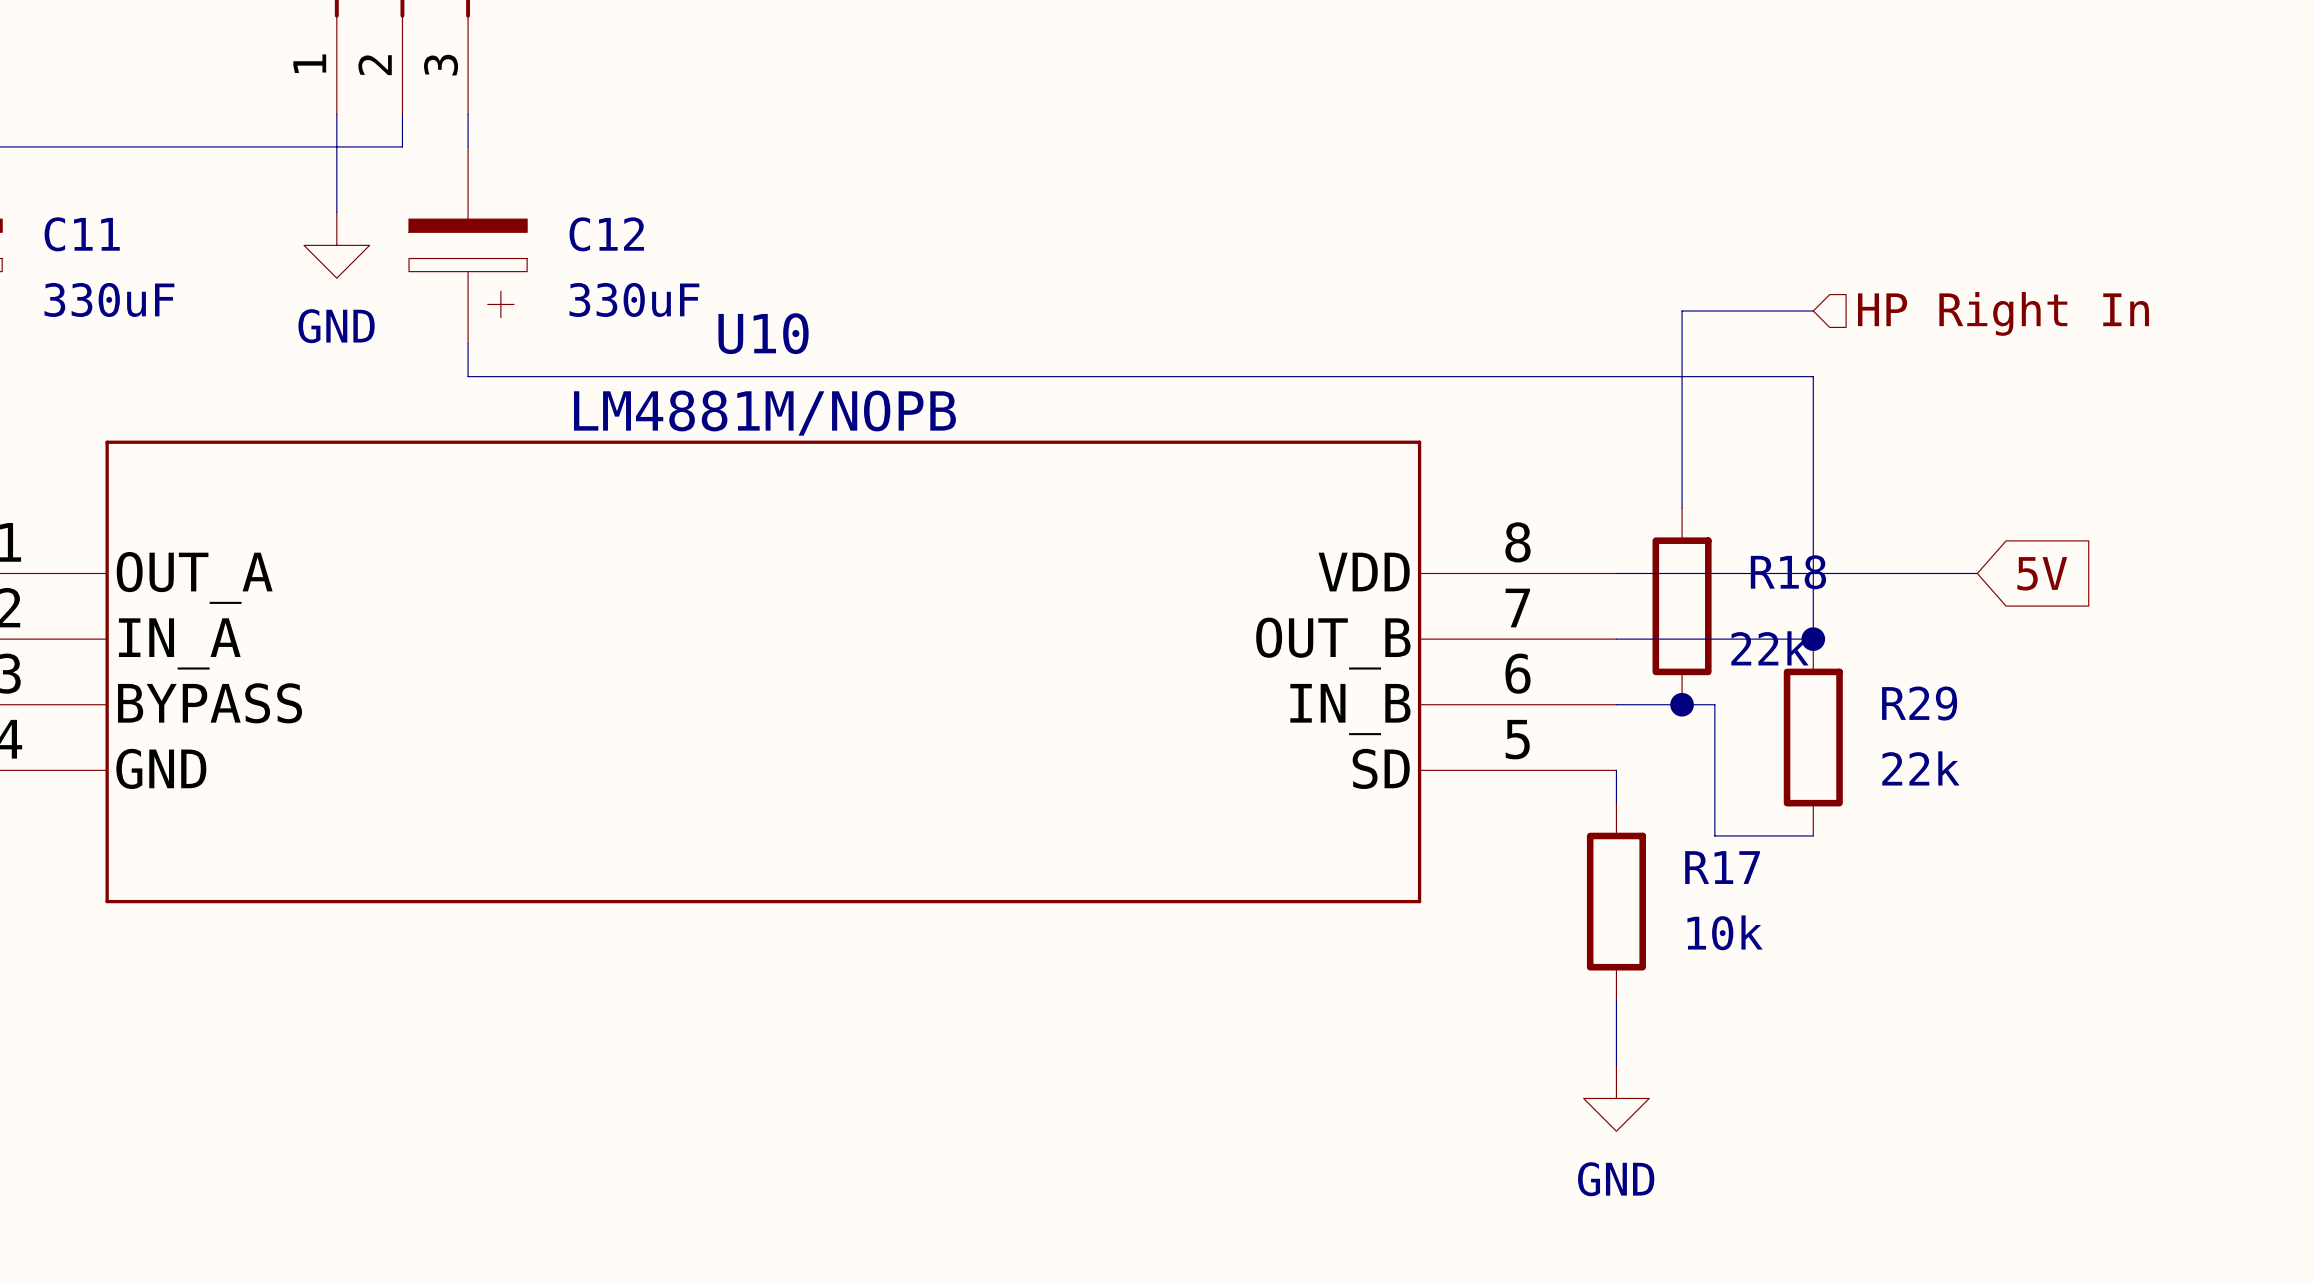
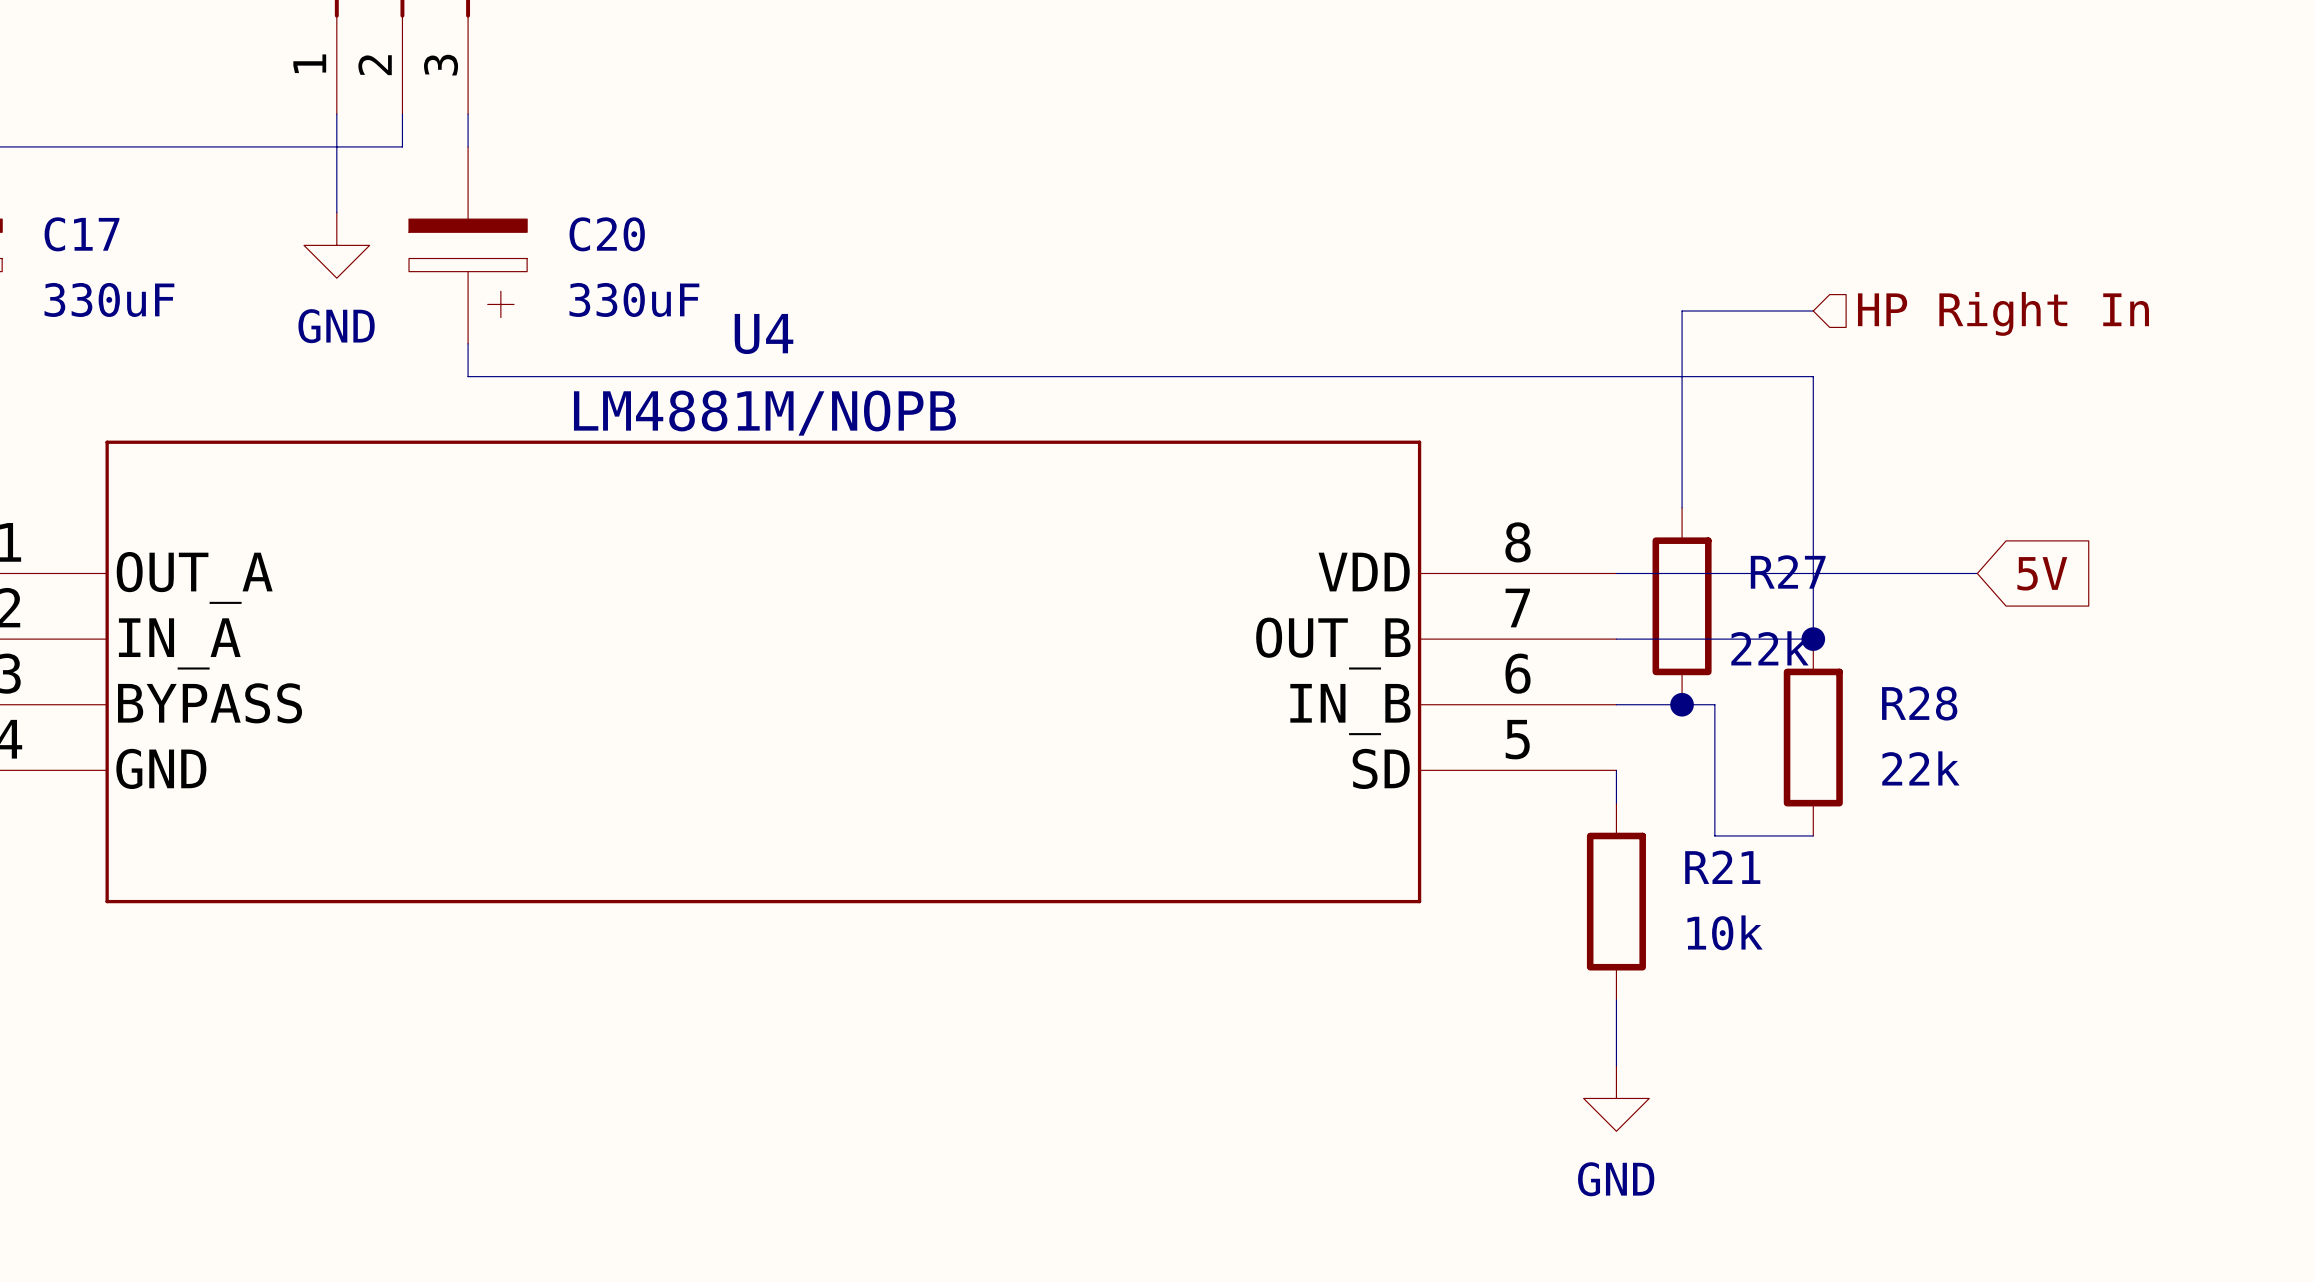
C11 name: C11 (82, 234) -> C17 (82, 234)
C12 name: C12 (606, 234) -> C20 (607, 234)
U10 name: U10 (763, 333) -> U4 (764, 334)
R18 name: R18 (1788, 572) -> R27 (1788, 571)
R29 name: R29 (1919, 703) -> R28 (1919, 703)
R17 name: R17 (1722, 867) -> R21 (1722, 867)

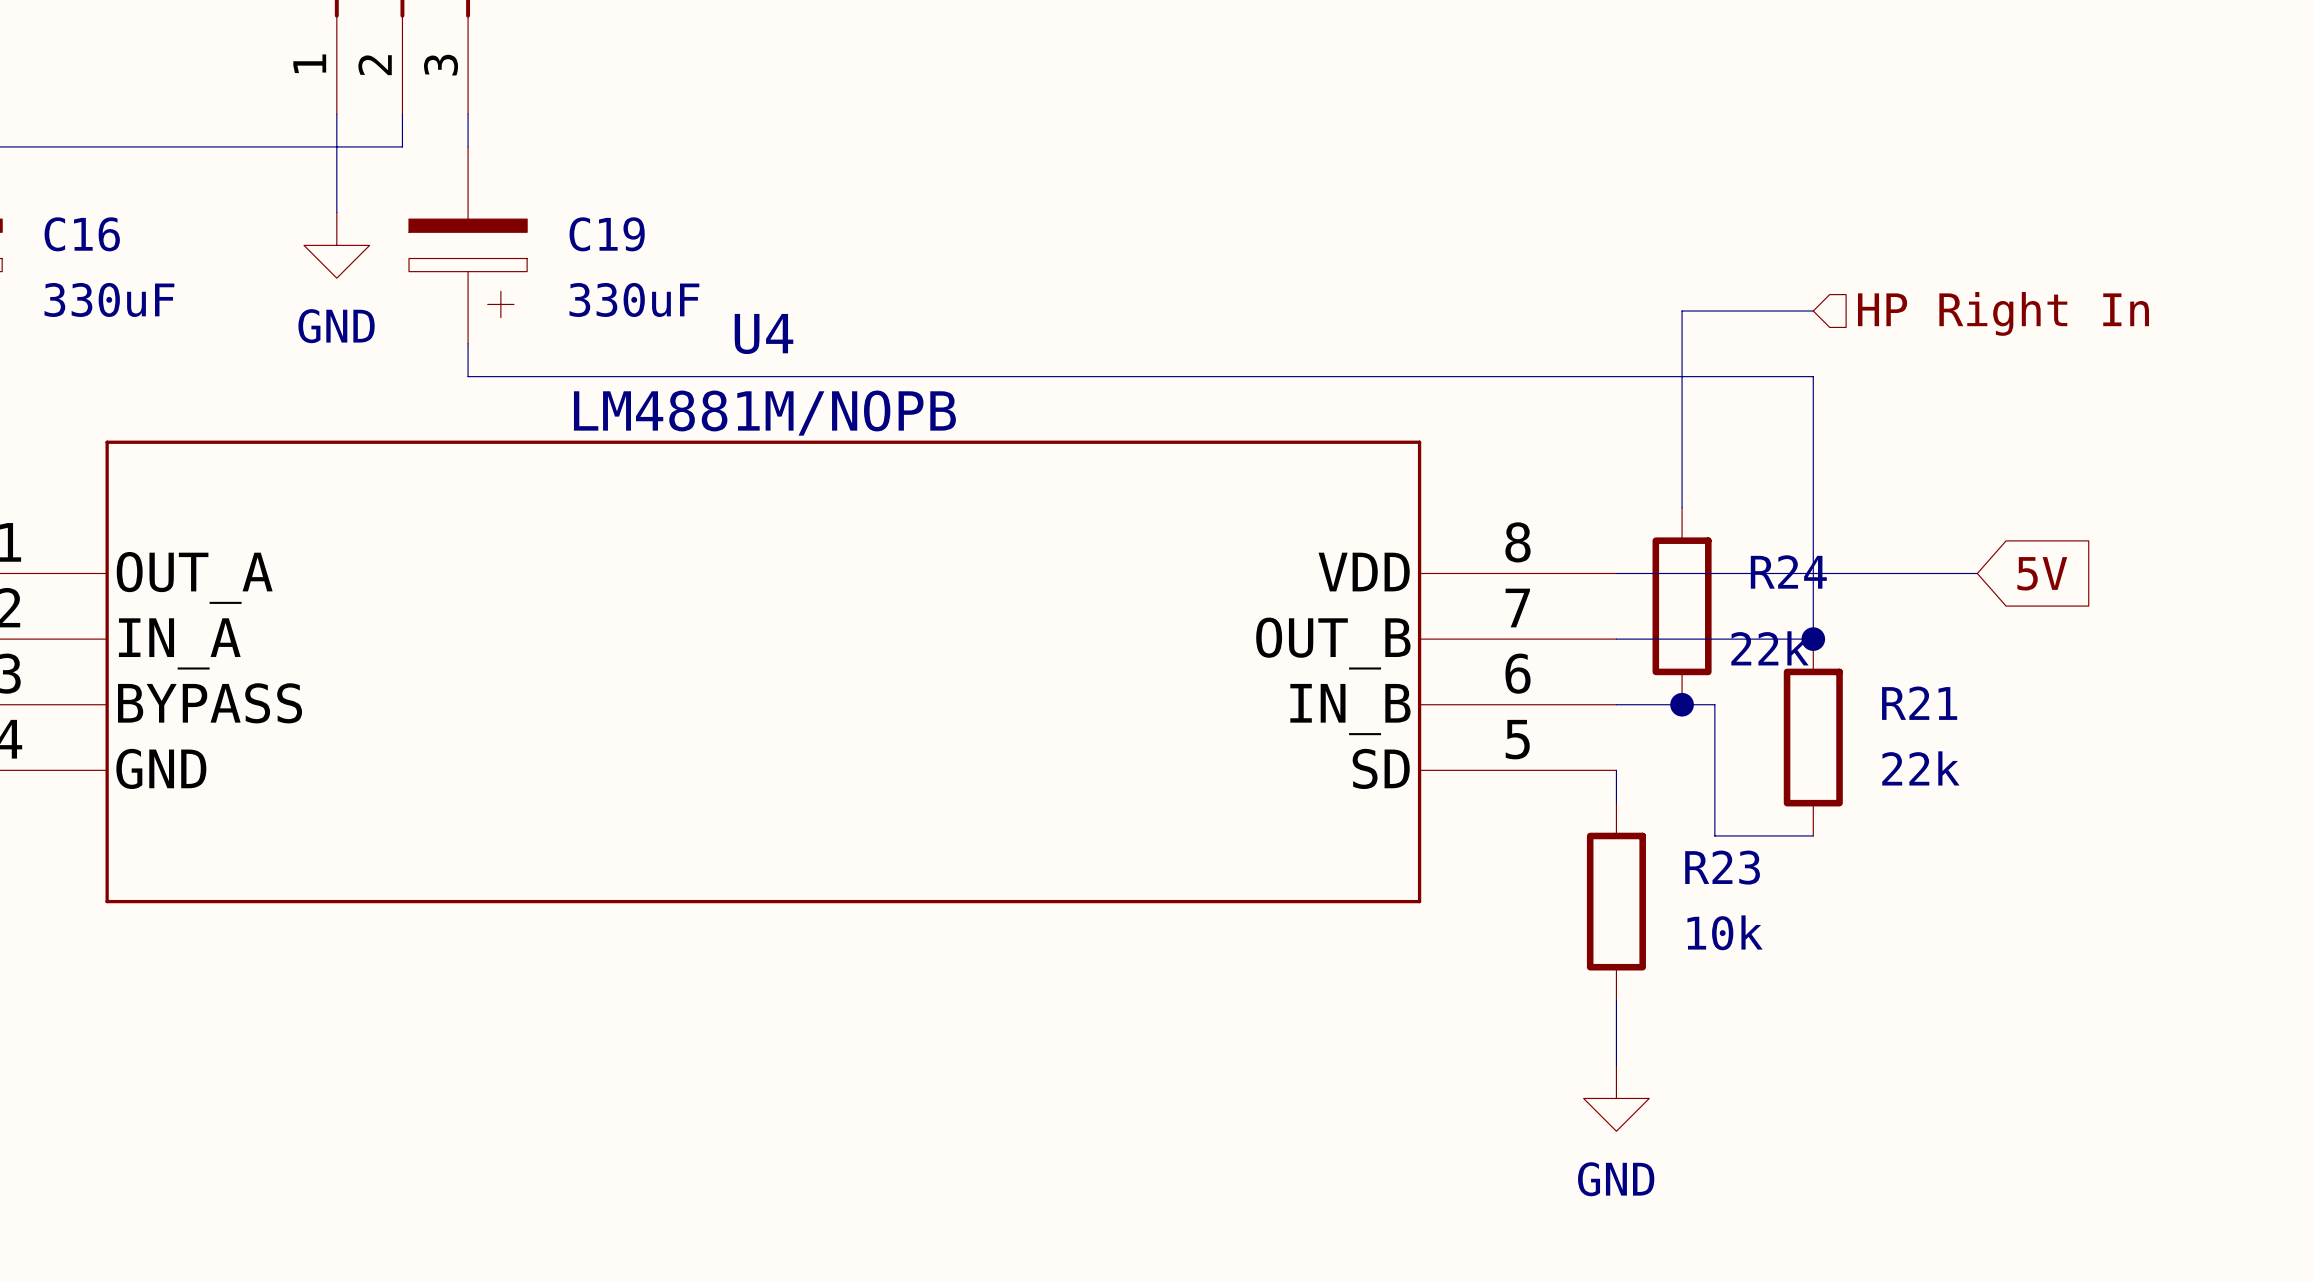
C17 name: C17 (82, 234) -> C16 (82, 234)
C20 name: C20 (607, 234) -> C19 (607, 234)
R27 name: R27 (1788, 571) -> R24 (1788, 571)
R28 name: R28 (1919, 703) -> R21 (1919, 703)
R21 name: R21 (1722, 867) -> R23 (1722, 867)

